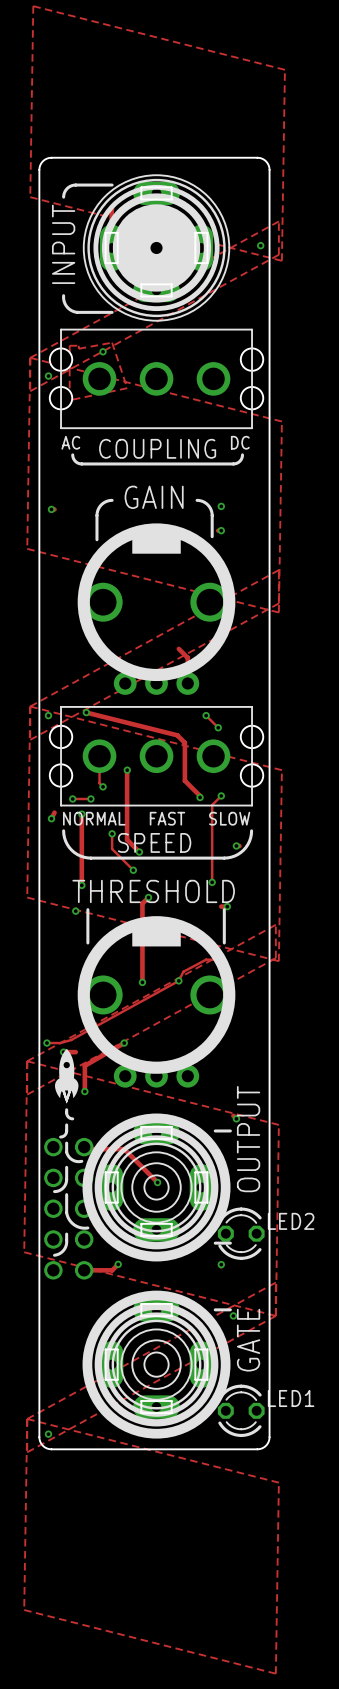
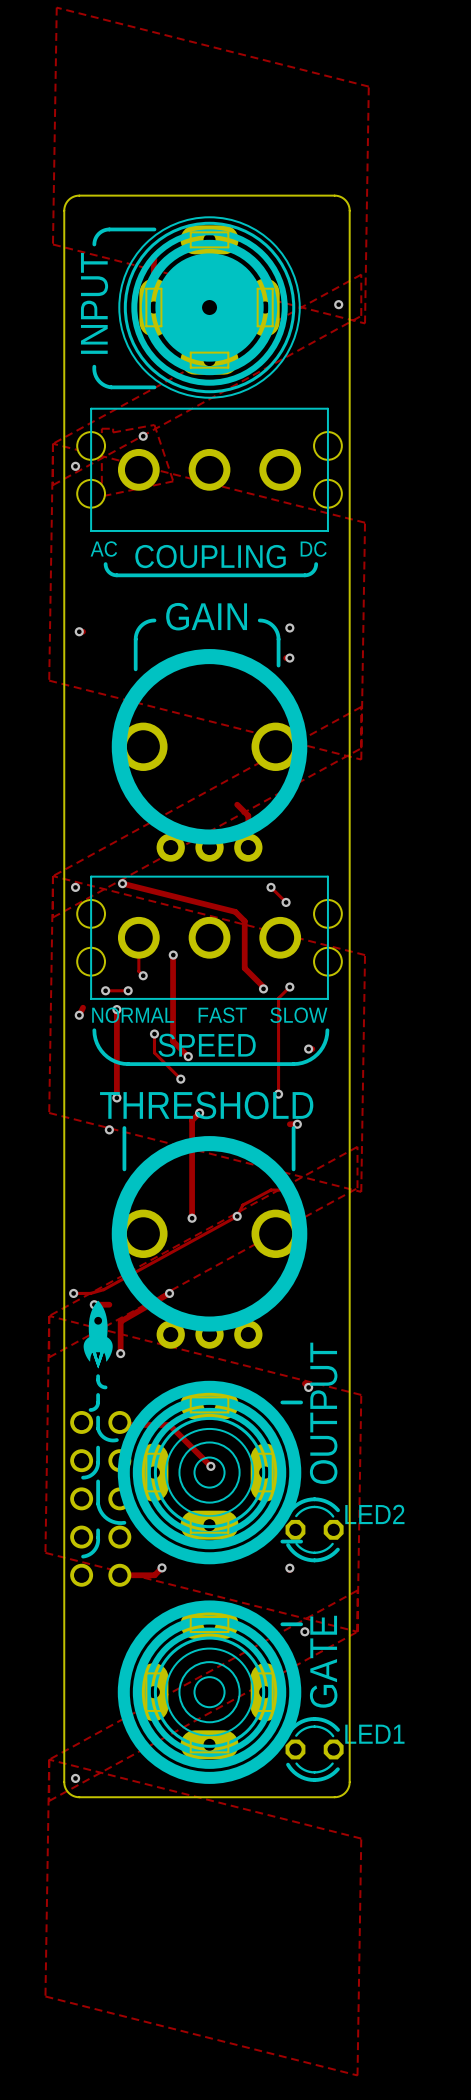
part footprint: [77, 523, 236, 695] -> [111, 649, 308, 862]
part footprint: [77, 916, 236, 1088] -> [111, 1136, 308, 1349]

